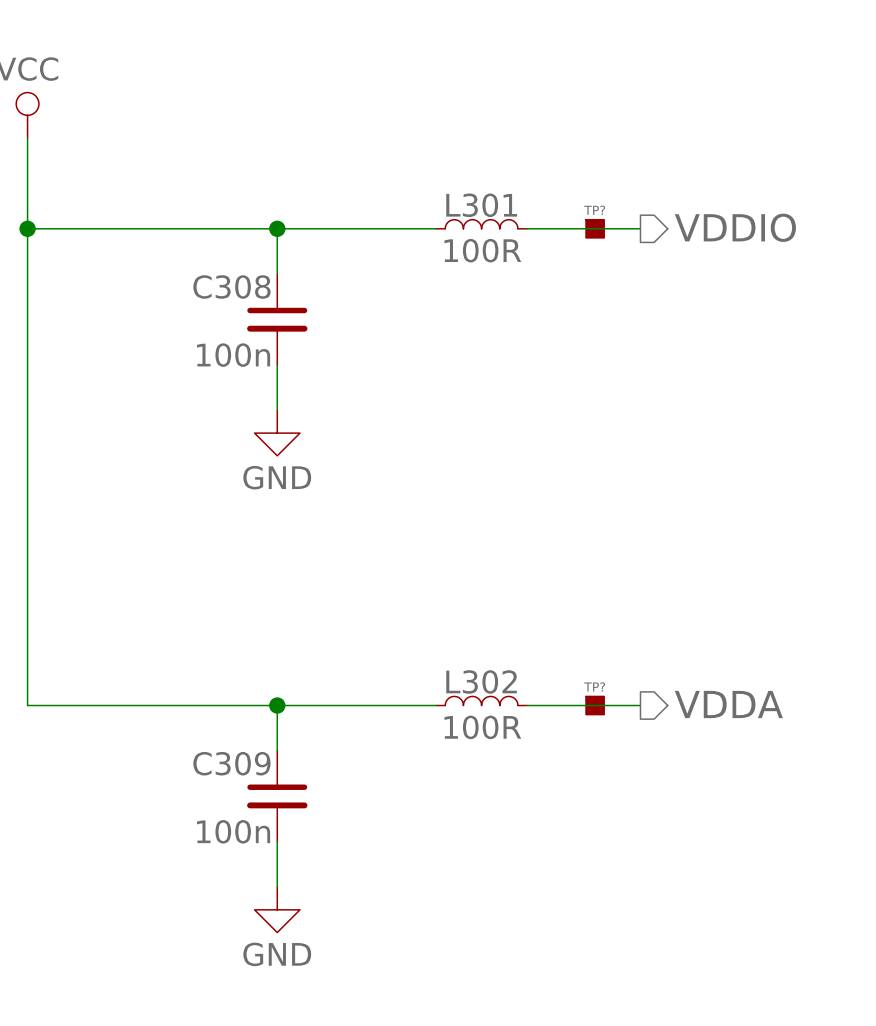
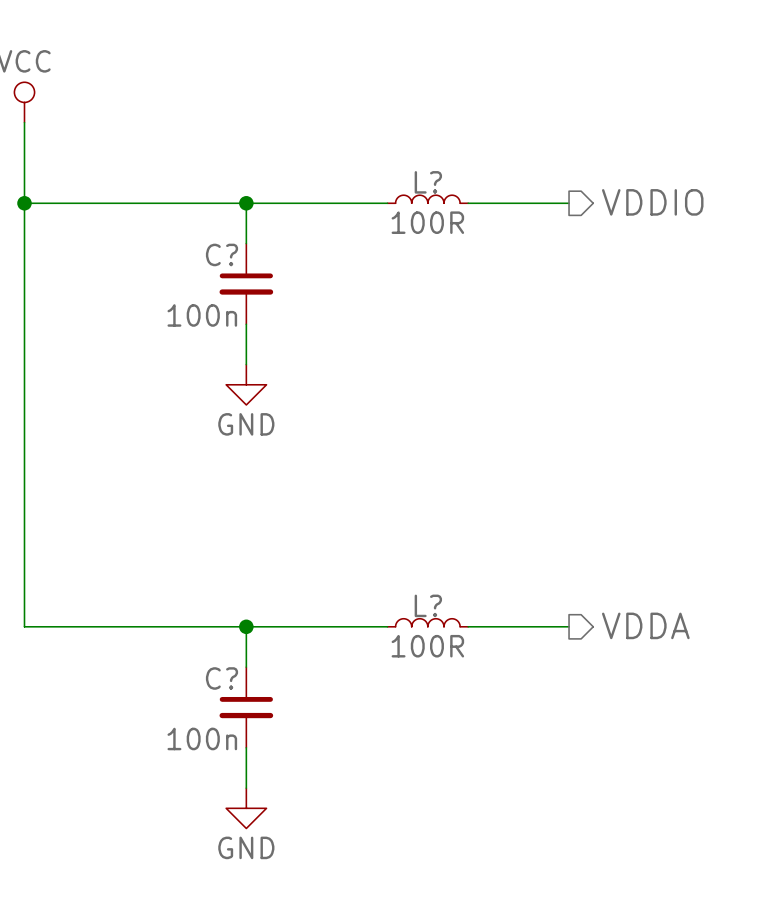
L301 name: L301 (481, 205) -> L? (428, 182)
TP?: (595, 228) -> none
C308 name: C308 (231, 286) -> C? (221, 254)
L302 name: L302 (481, 681) -> L? (428, 605)
TP?: (595, 705) -> none
C309 name: C309 (231, 763) -> C? (221, 678)

